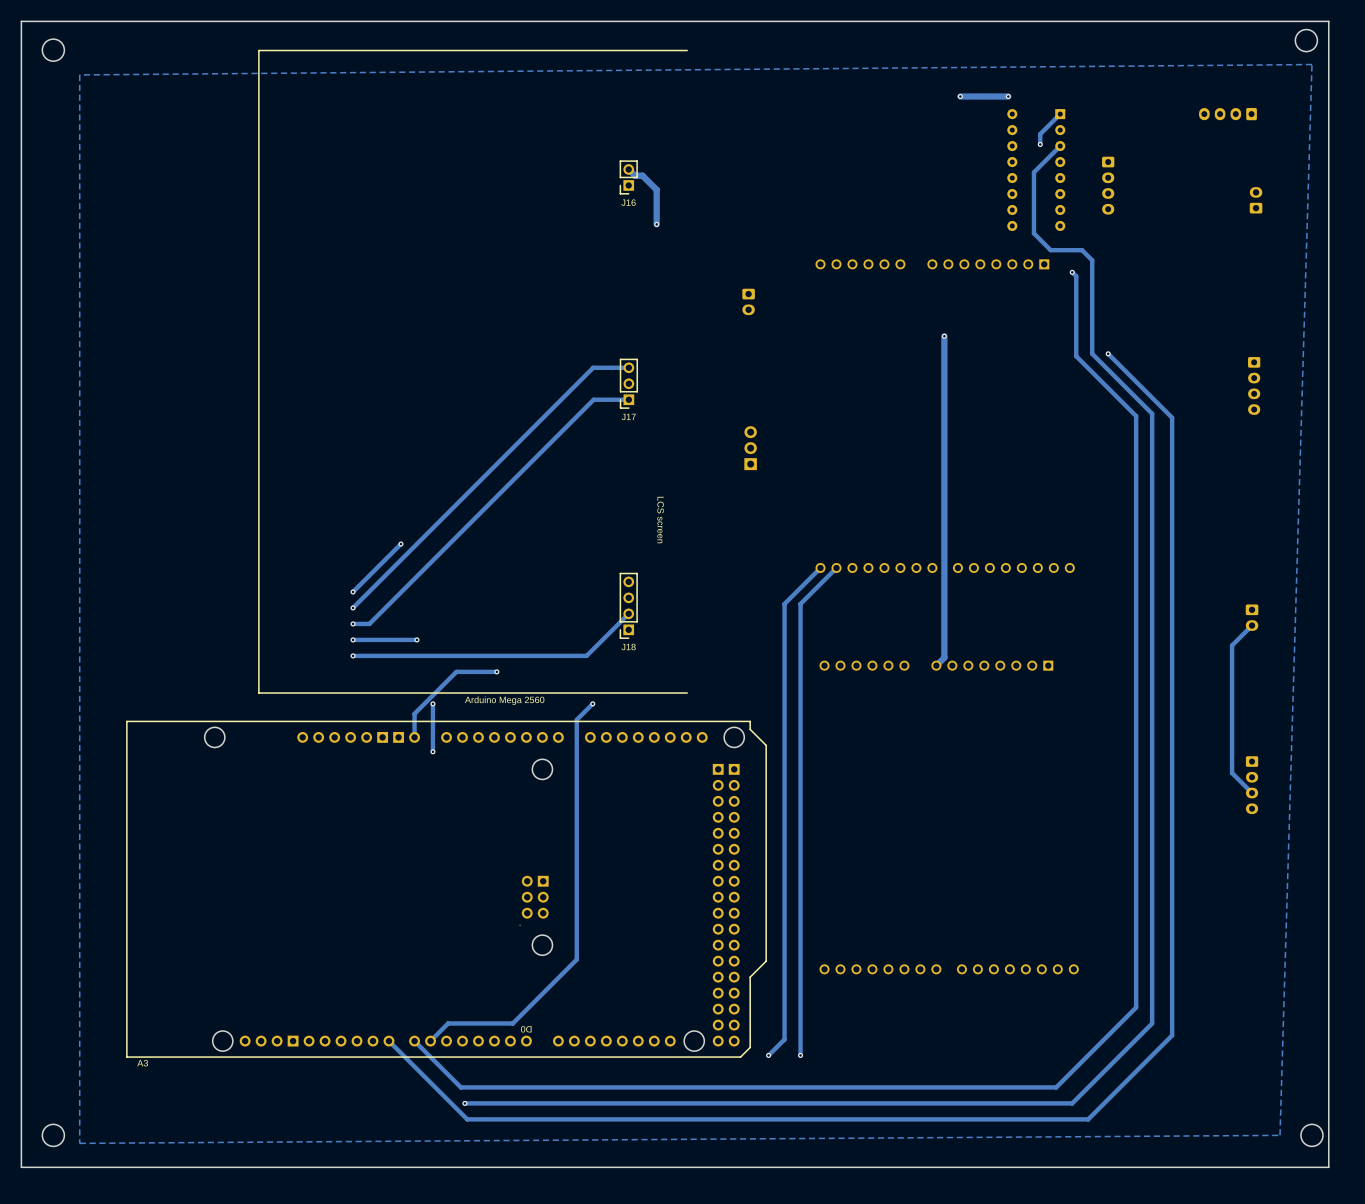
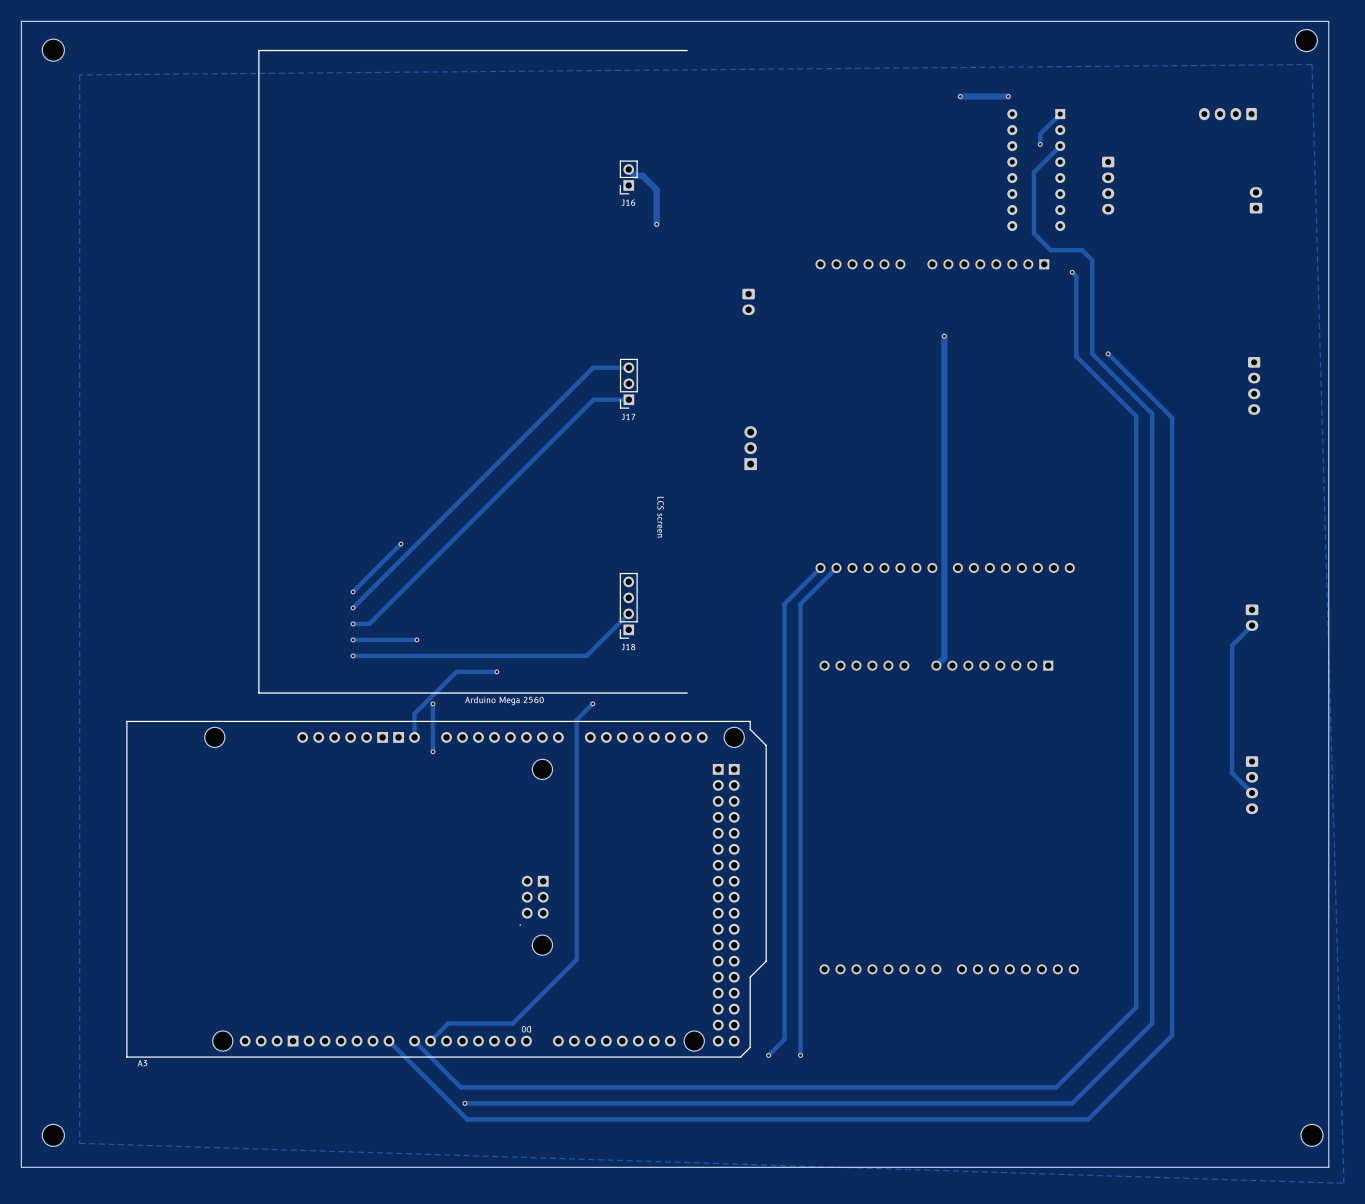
zone outline: (1311, 64) (1280, 1135) (79, 1143) -> (1311, 64) (1343, 1183) (79, 1143)

